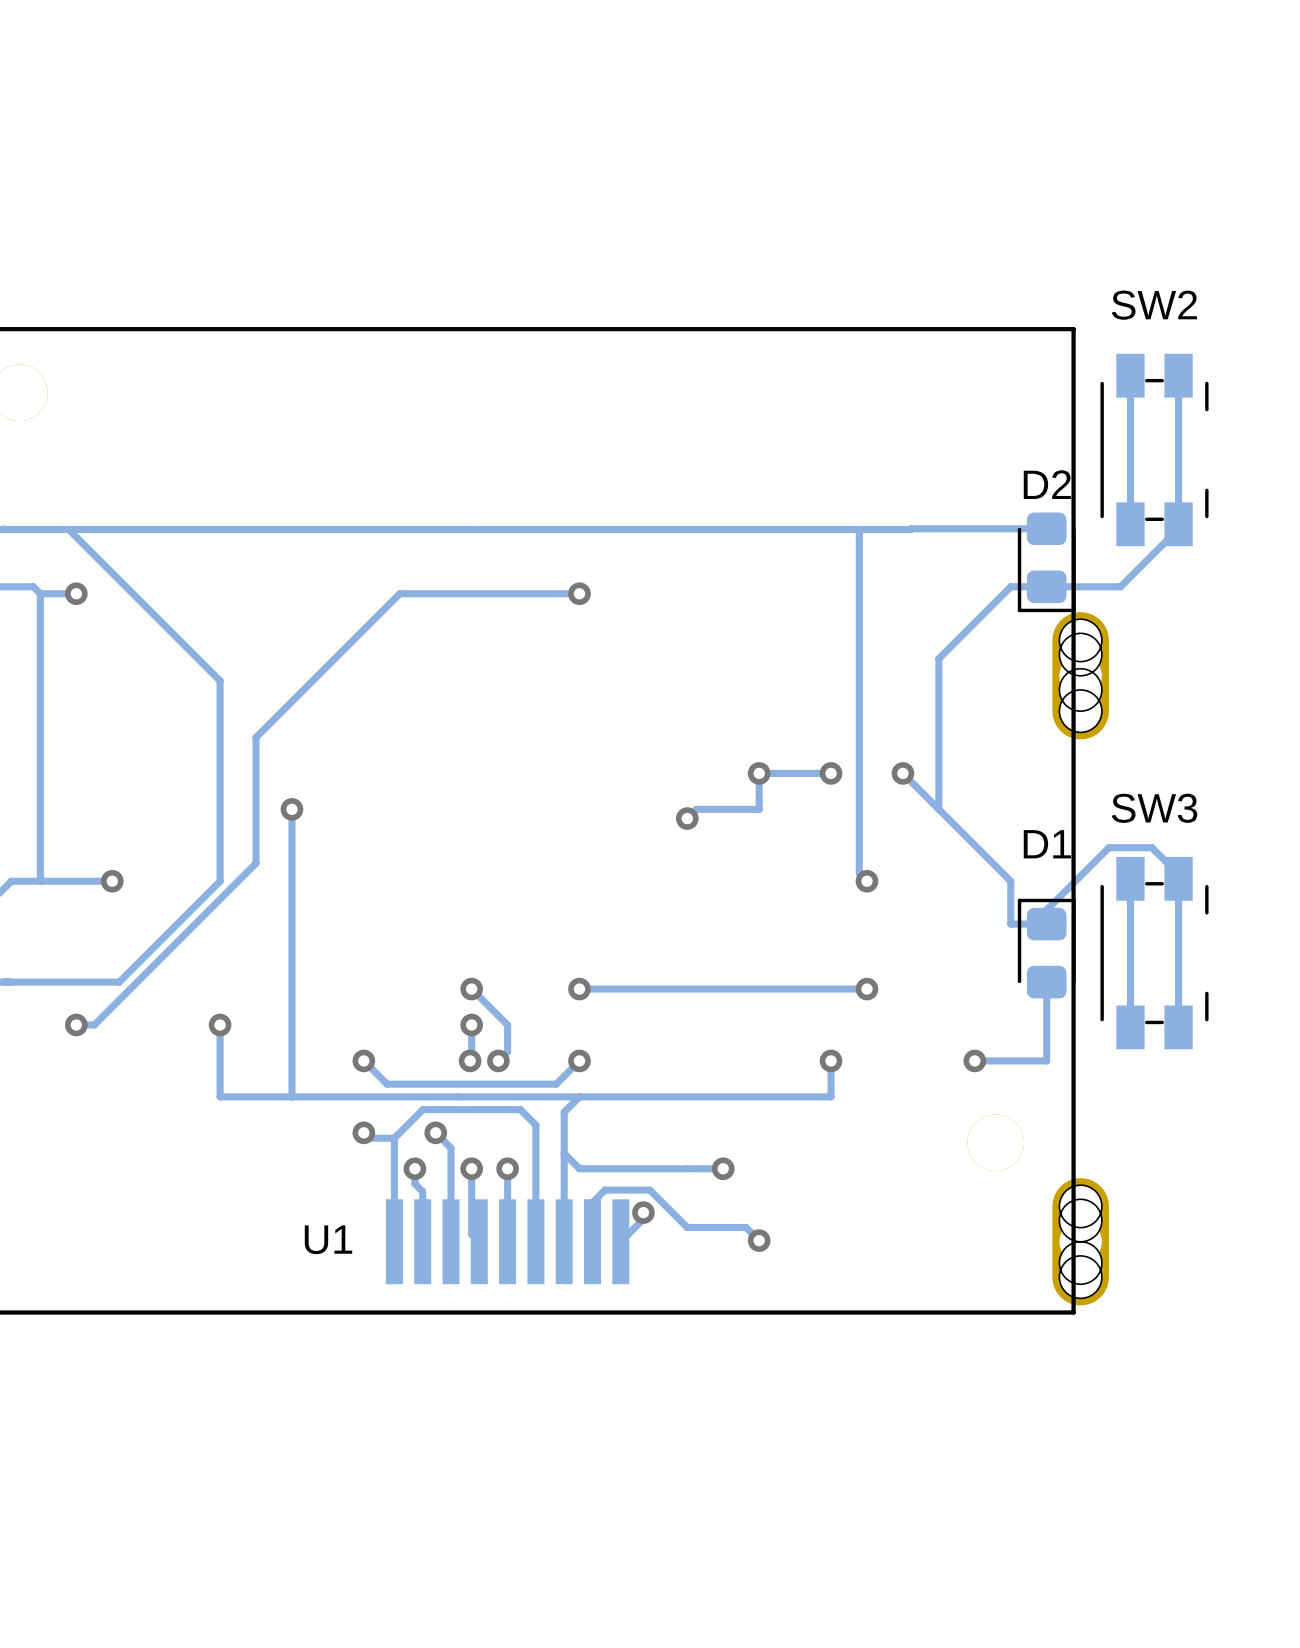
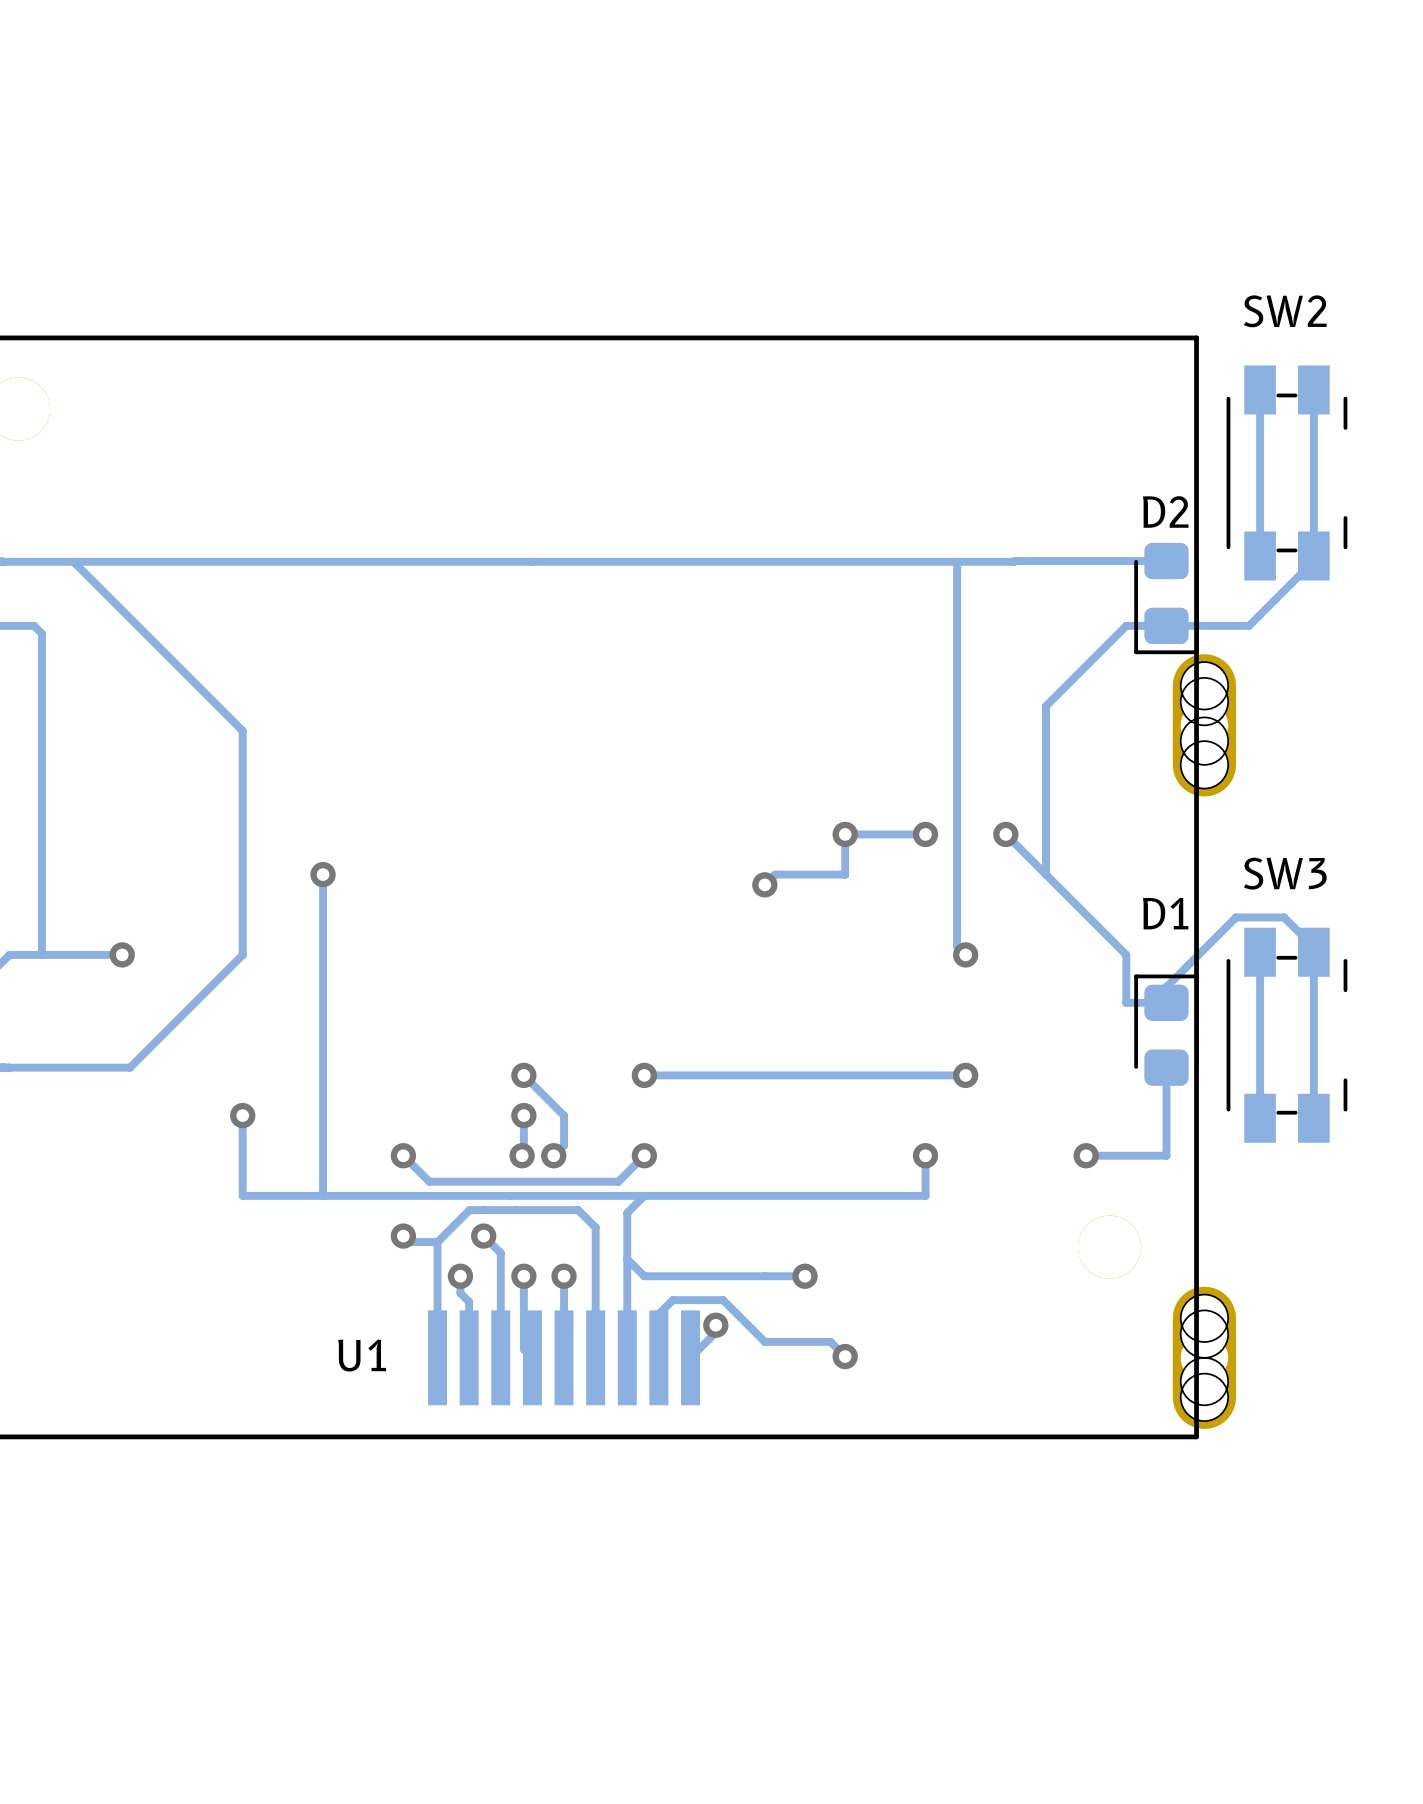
track: (76, 593) (40, 593) -> none
via: (76, 593) -> none
track: (579, 593) (399, 593) (256, 737) (256, 863) (94, 1025) (76, 1025) -> none
via: (579, 593) -> none
via: (76, 1025) -> none

